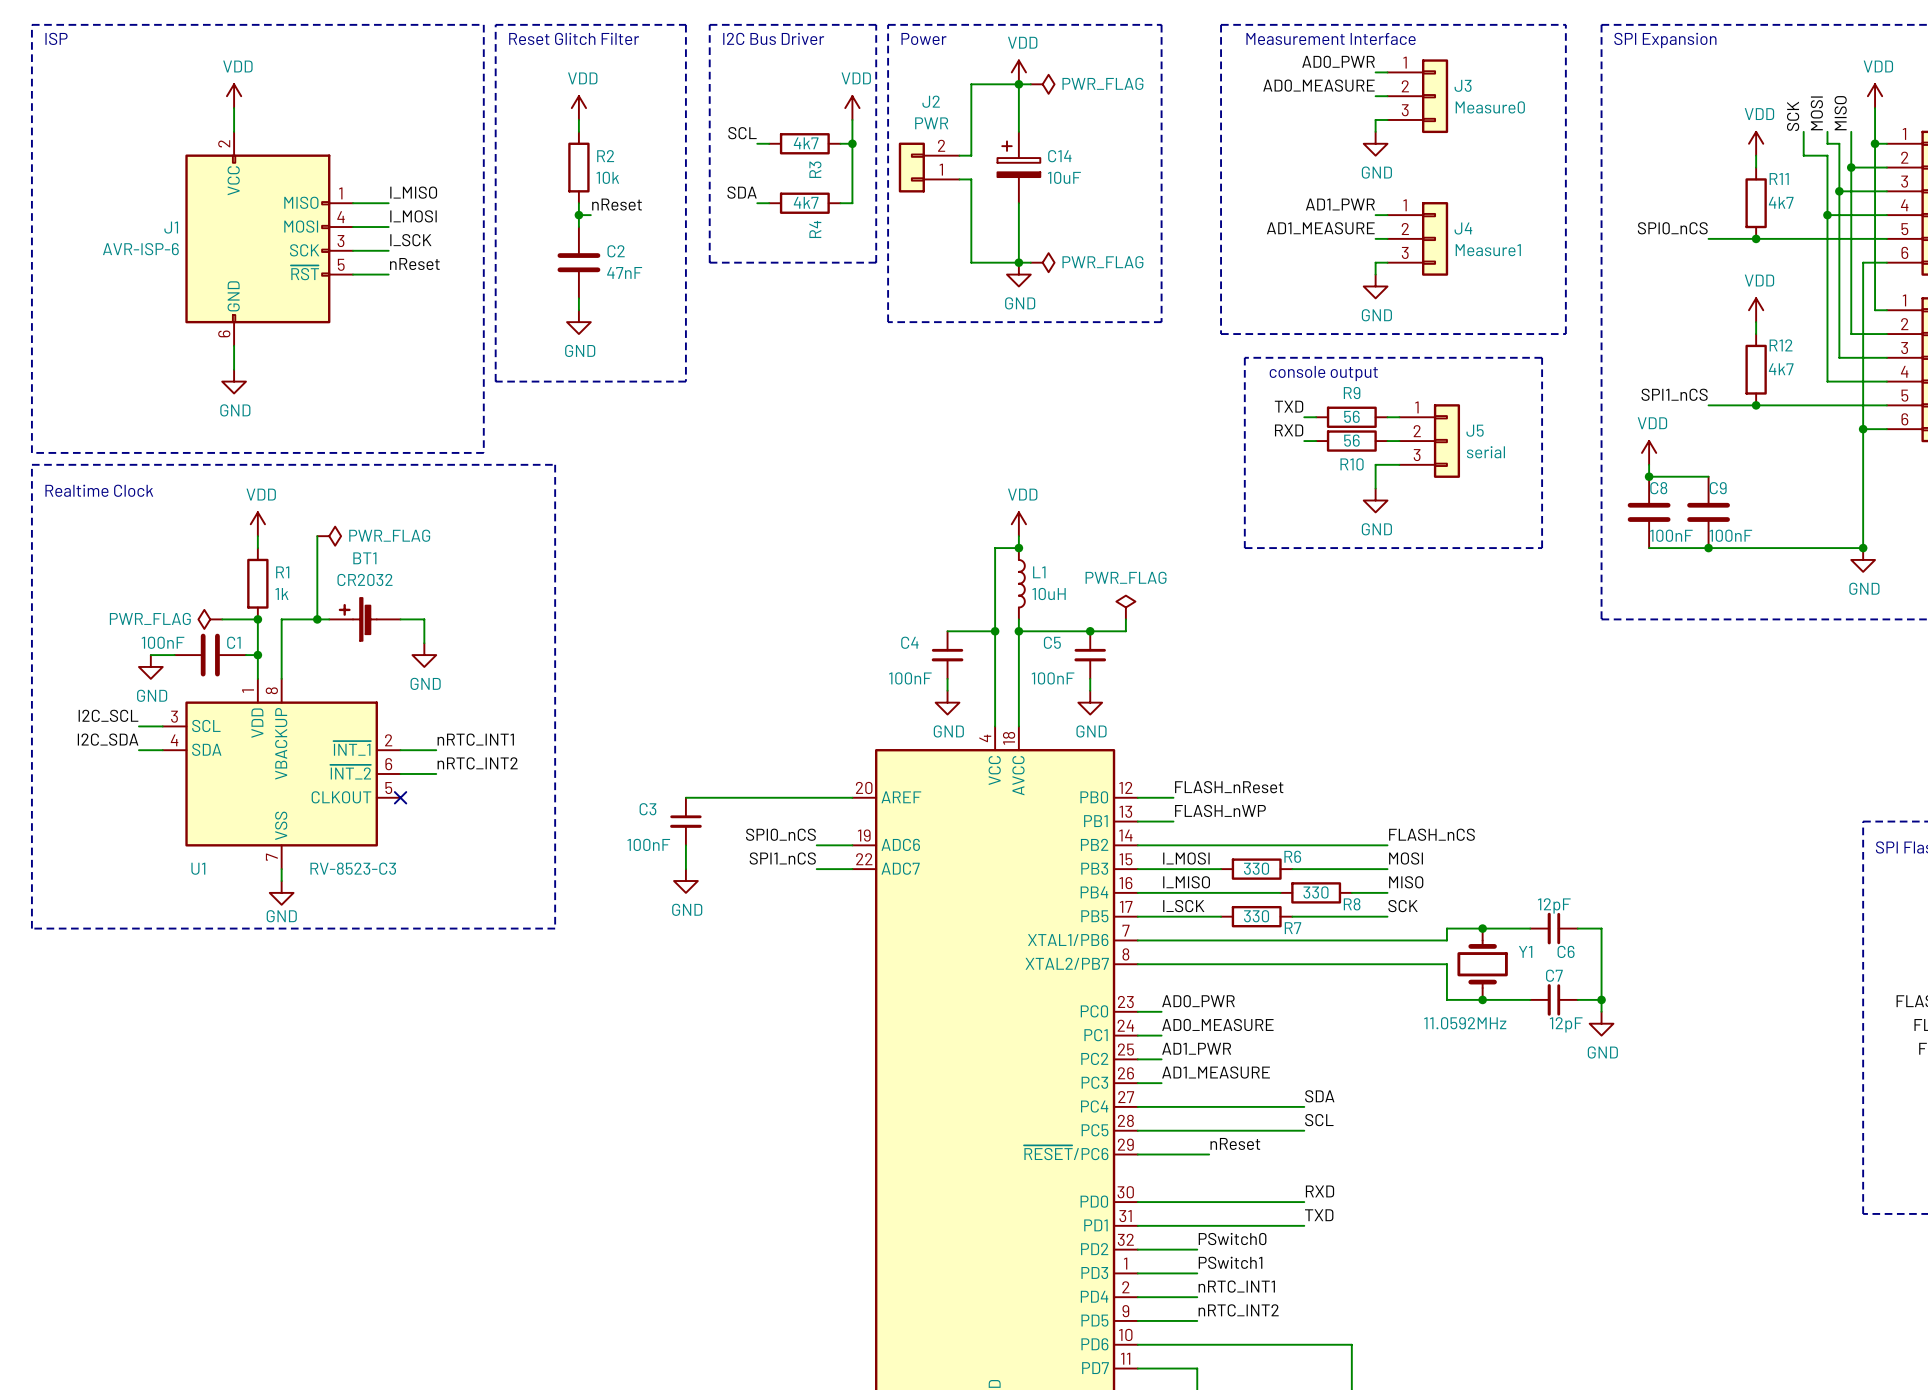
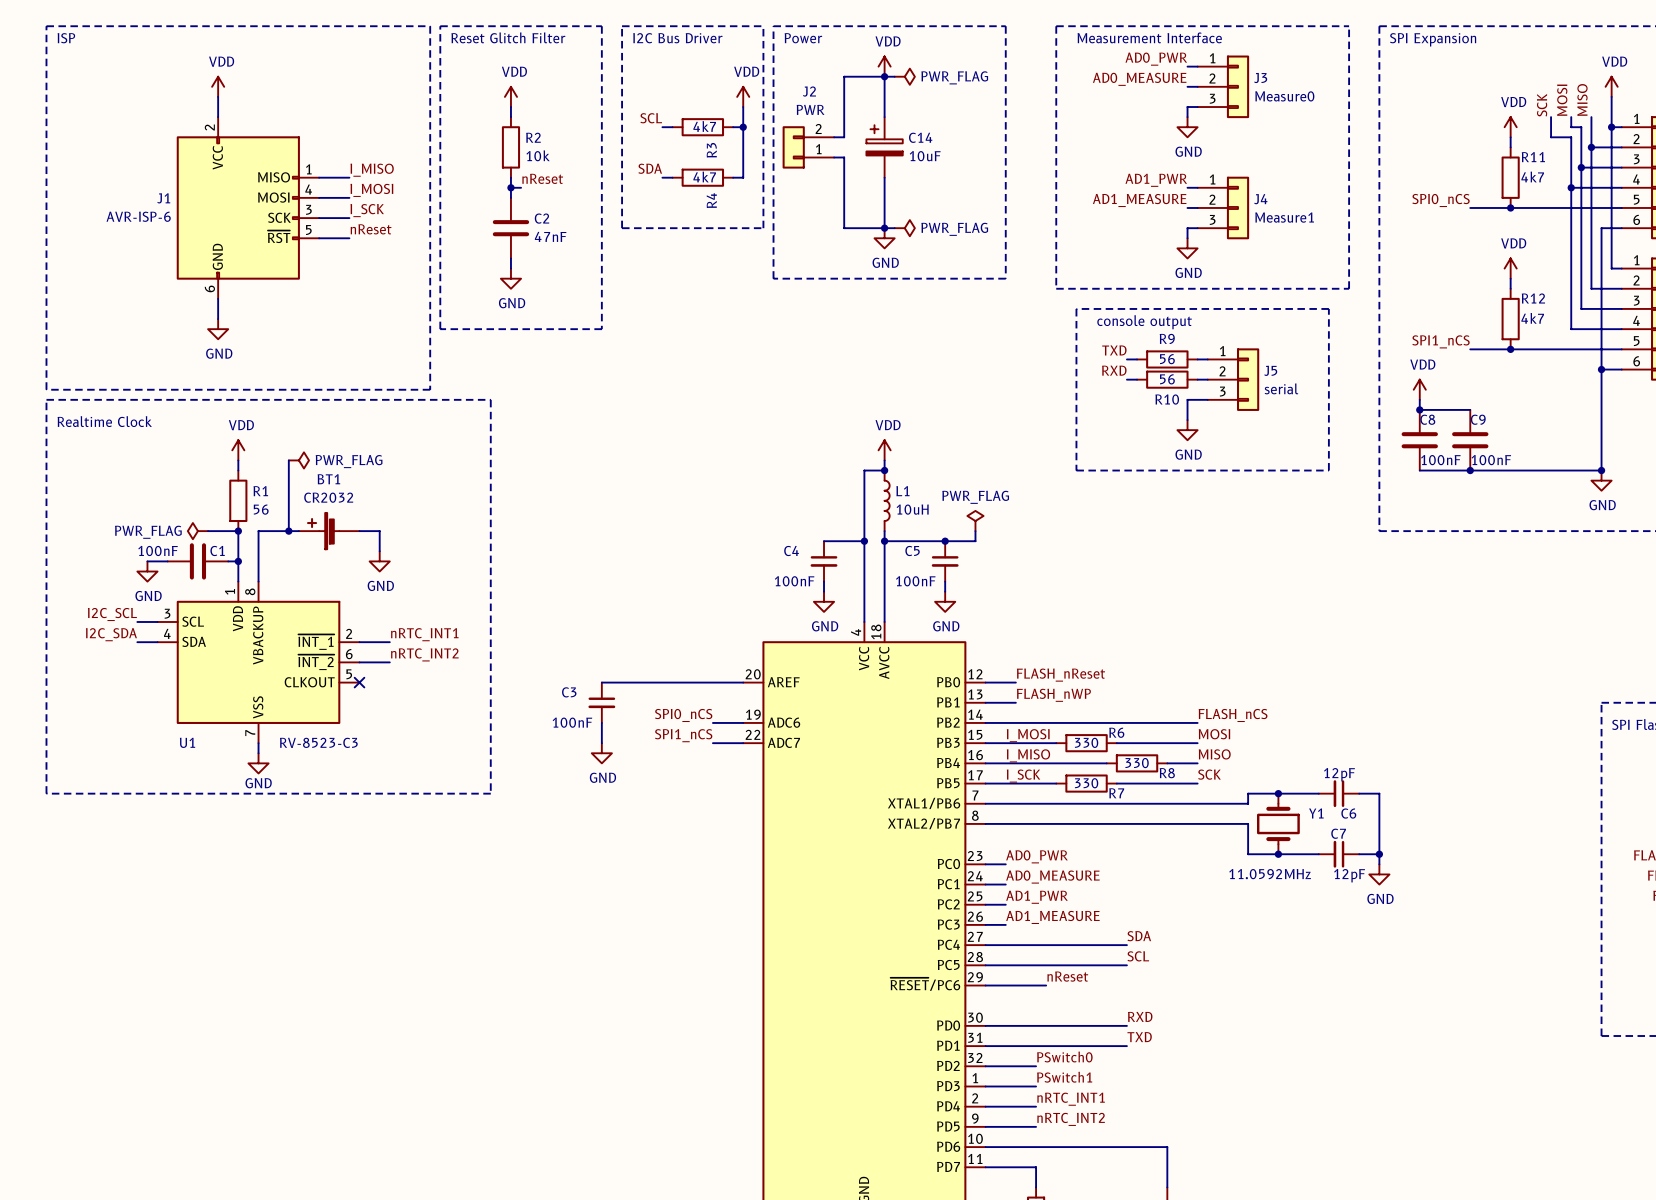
R1 value: 1k (281, 593) -> 56 (261, 509)

